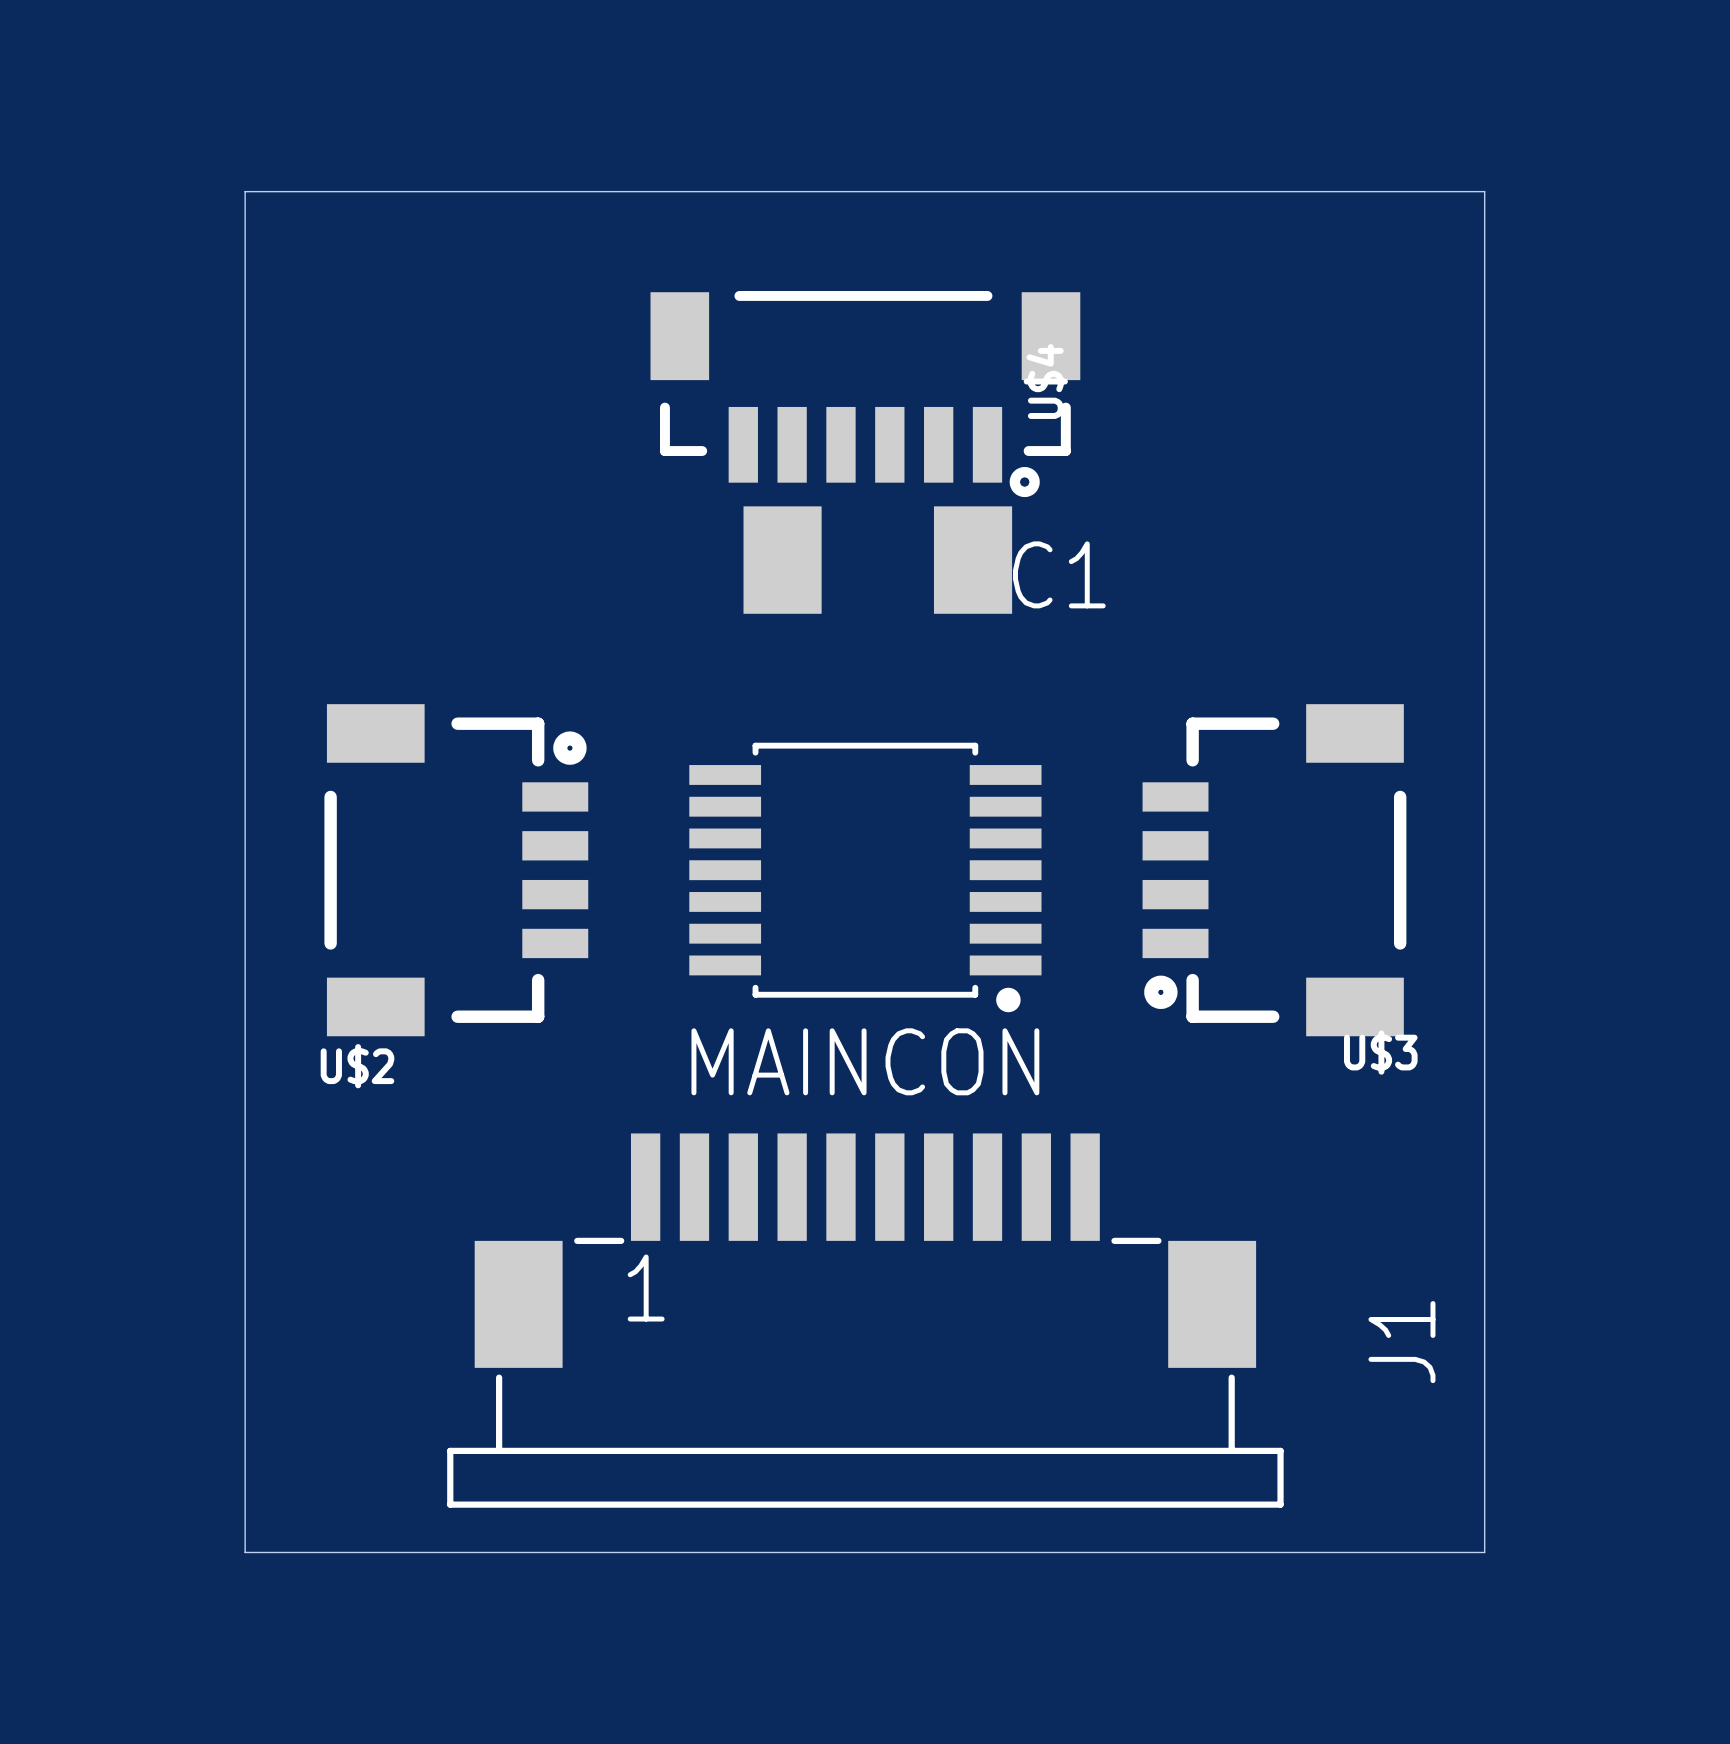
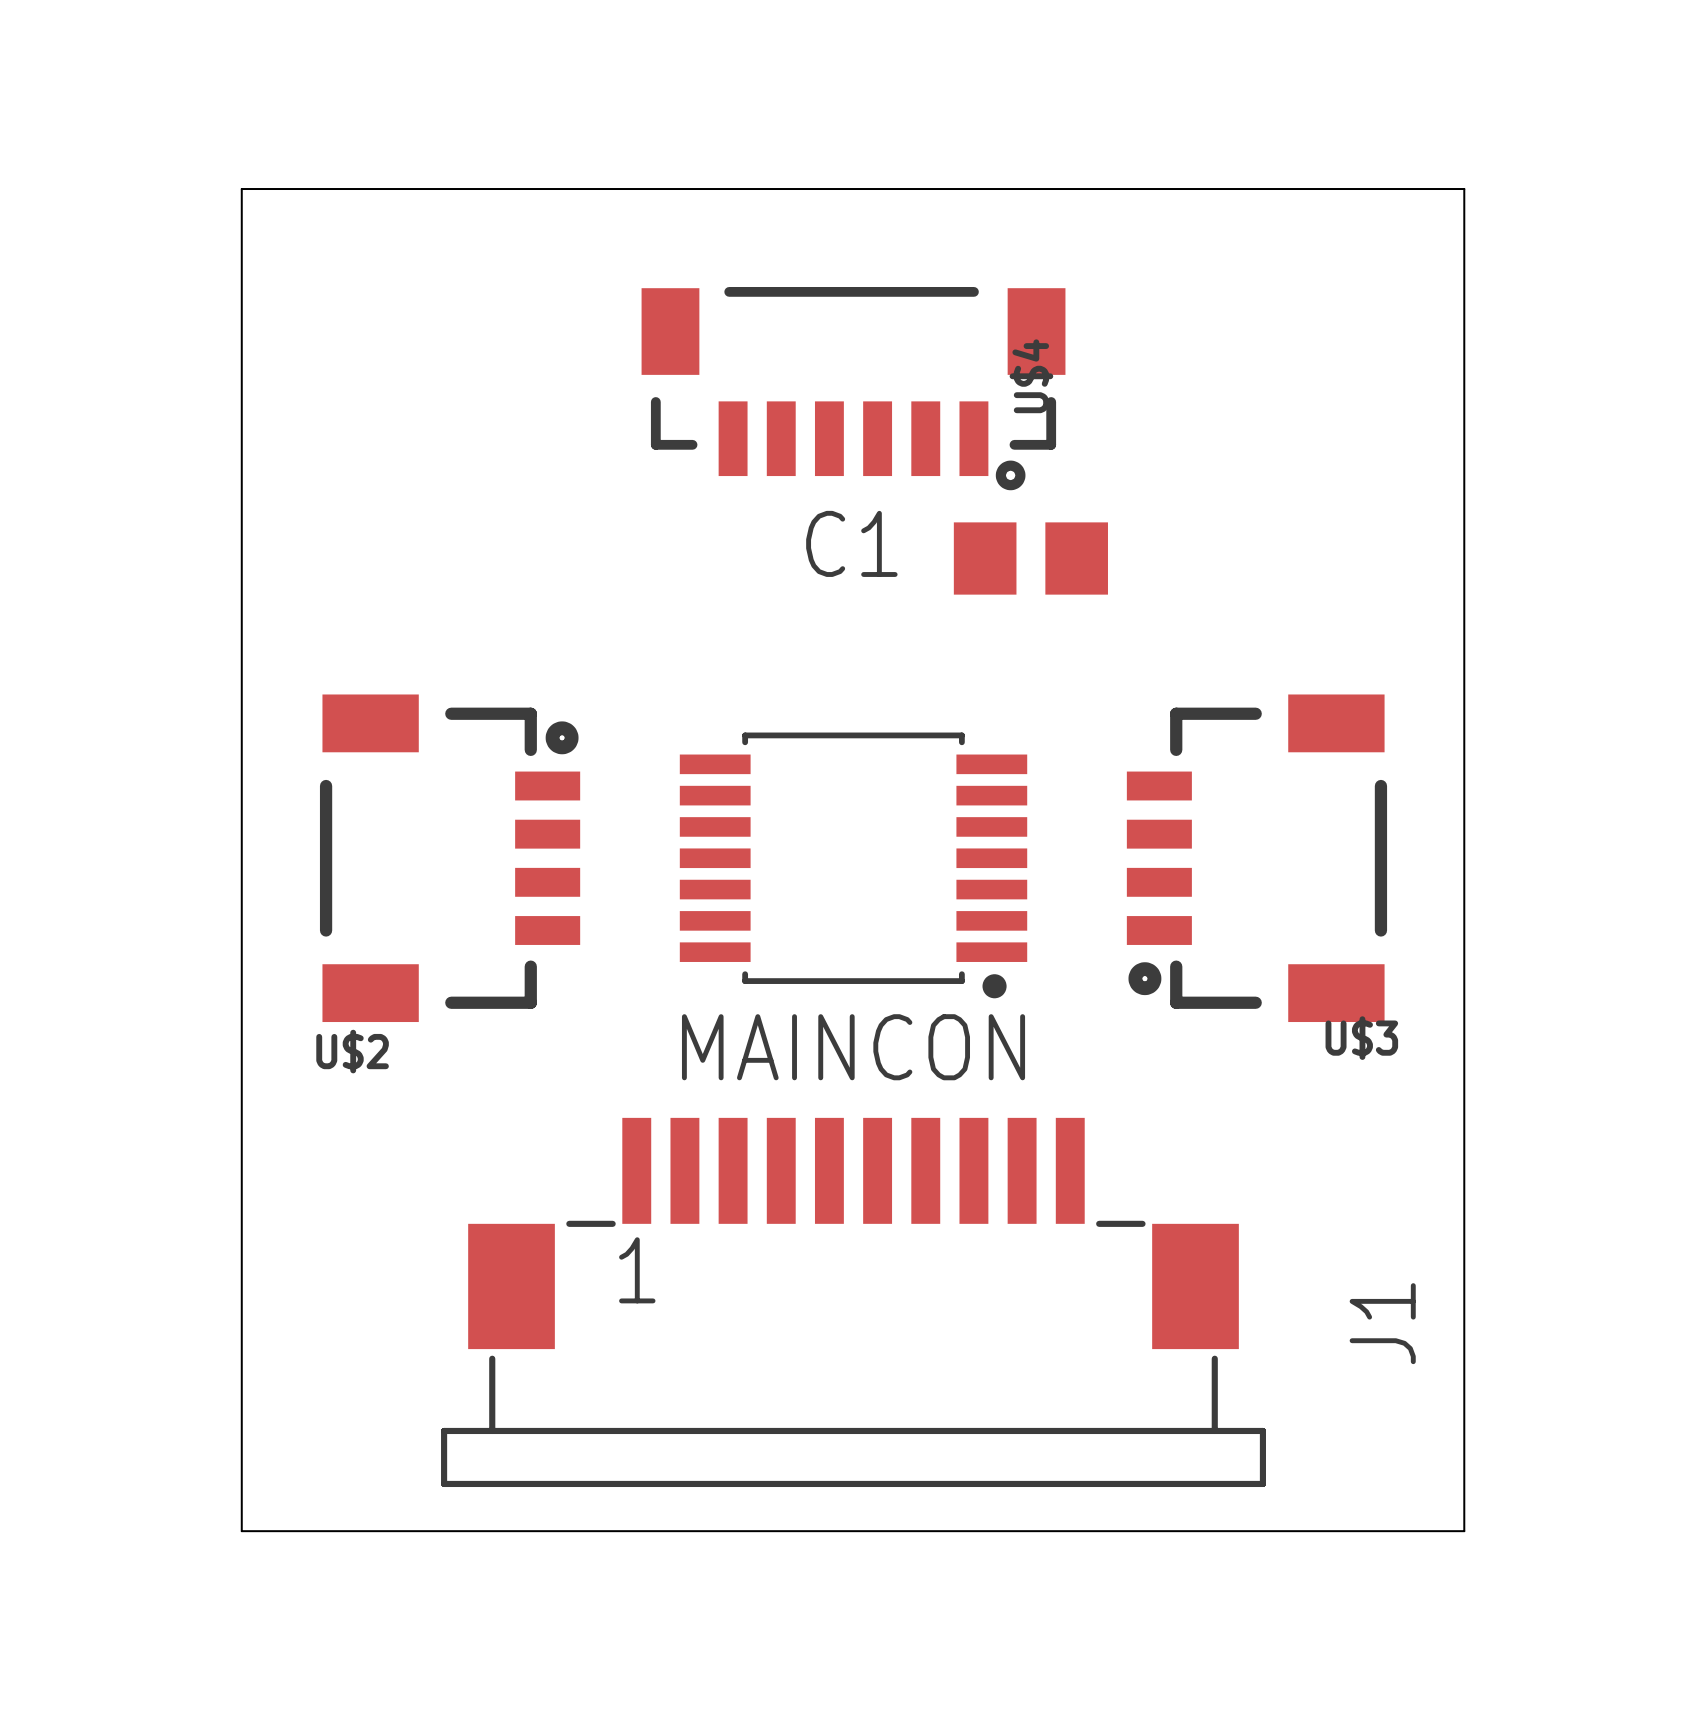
C1 footprint: [743, 506, 1013, 614] -> [953, 522, 1108, 595]
C1 name position: C1 (1059, 574) -> C1 (851, 543)

